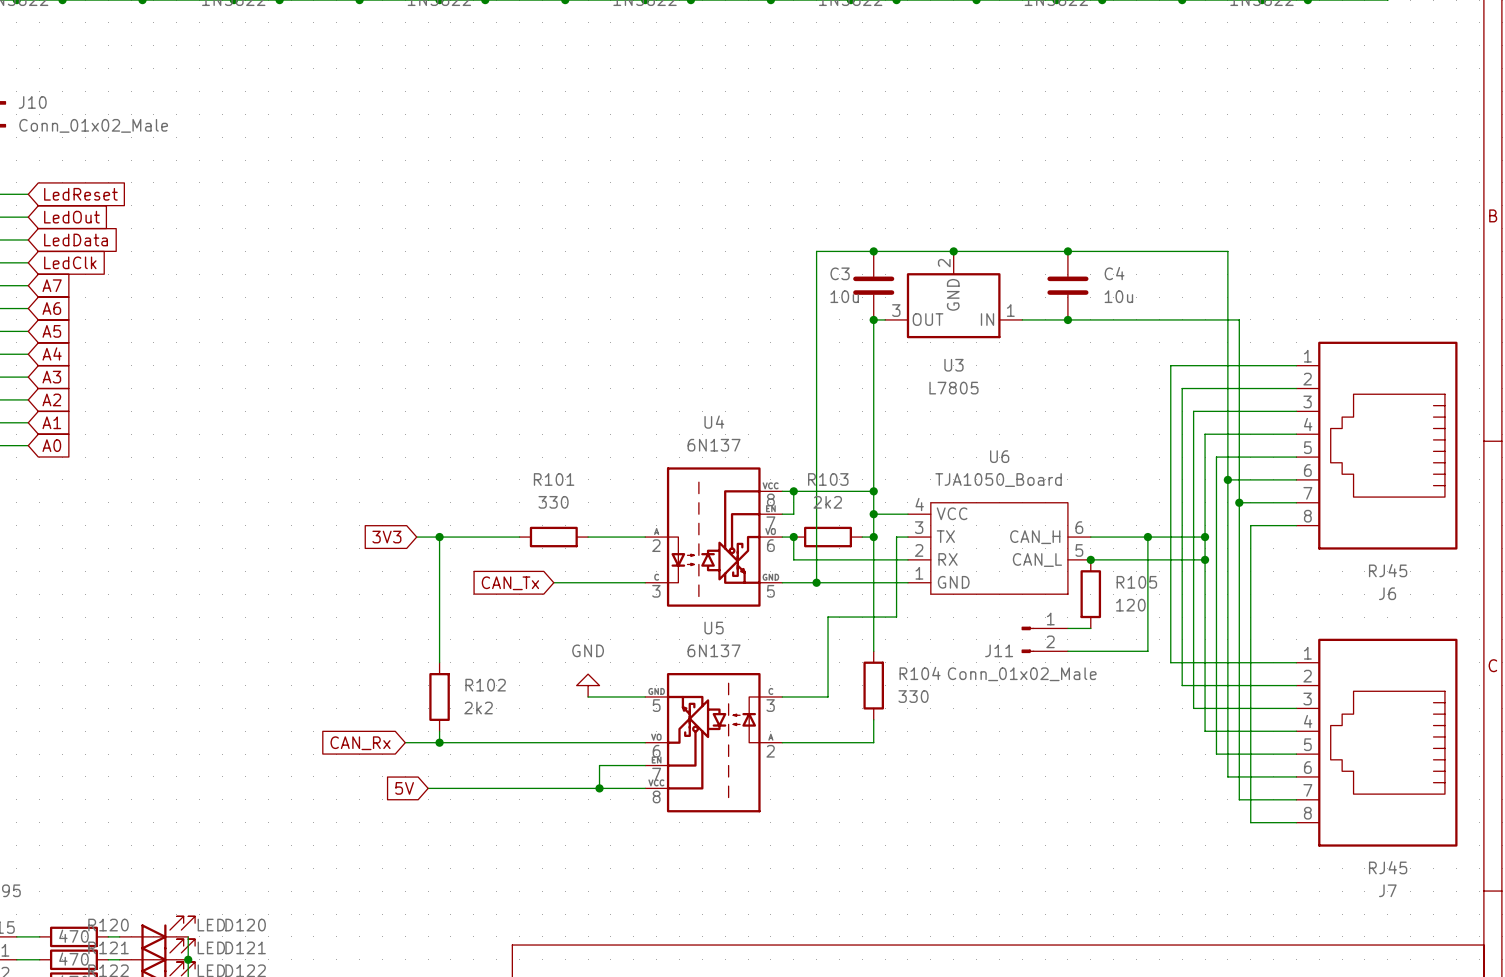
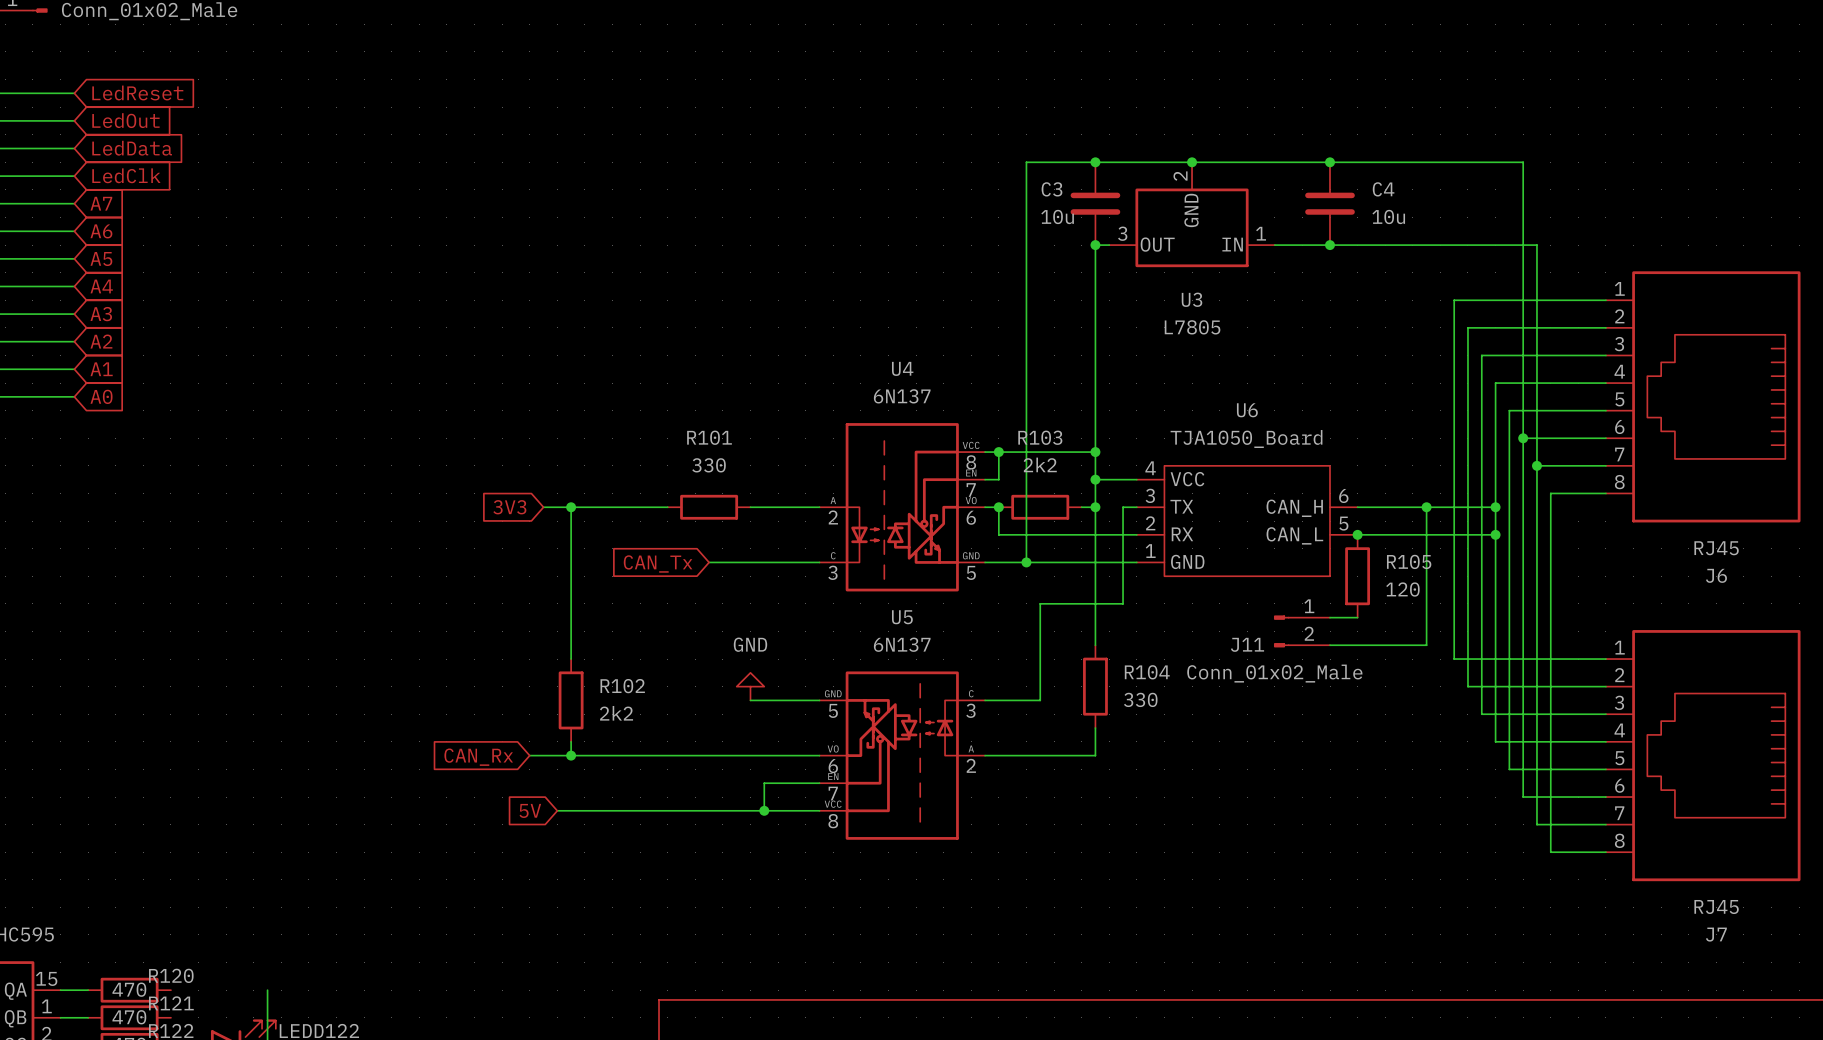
D120: LED (157, 932) -> none
wire: (108, 936) (119, 936) -> none
D121: LED (157, 955) -> none
wire: (108, 959) (119, 959) -> none
junction: (188, 959) -> none

